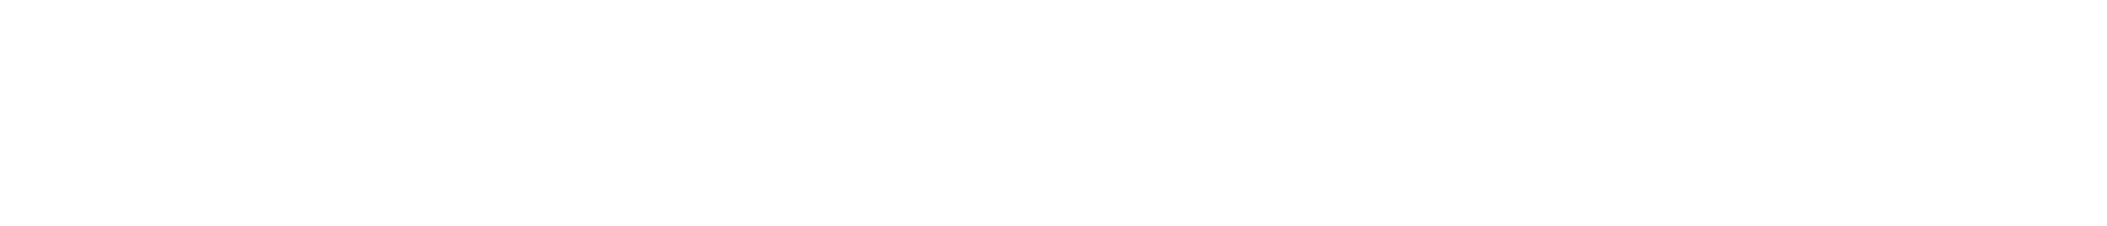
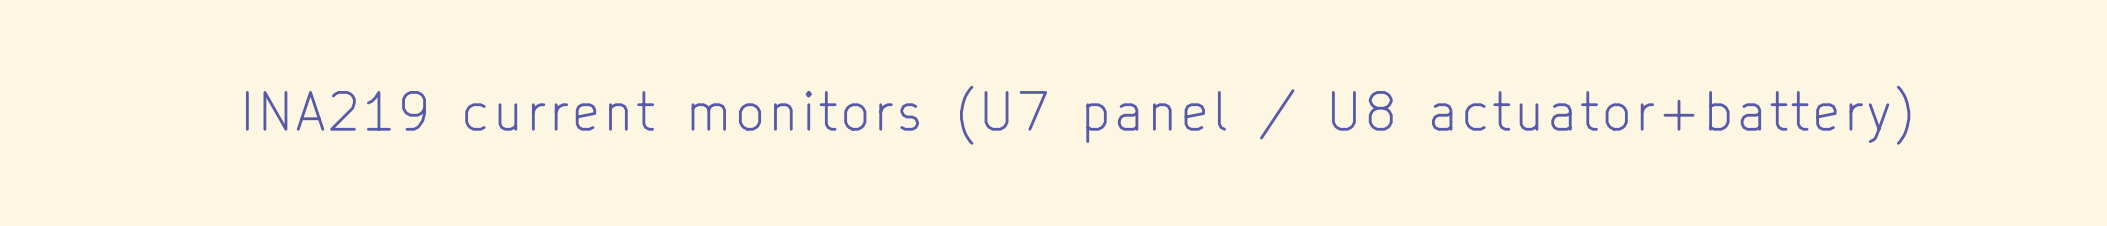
text: none -> INA219 current monitors (U7 panel / U8 actuator+battery) (1078, 115)

